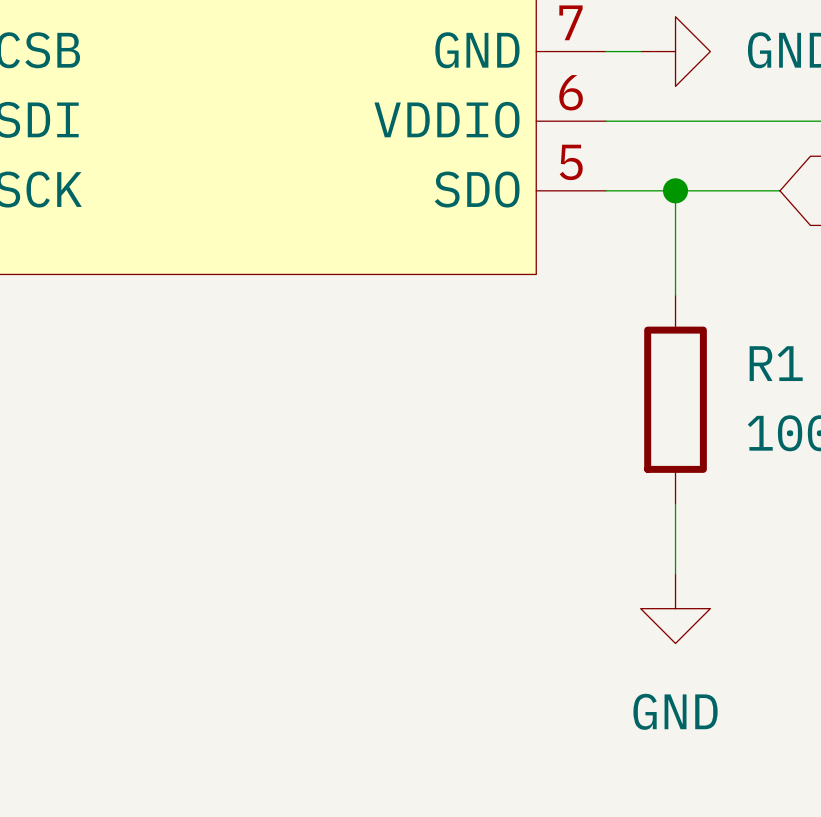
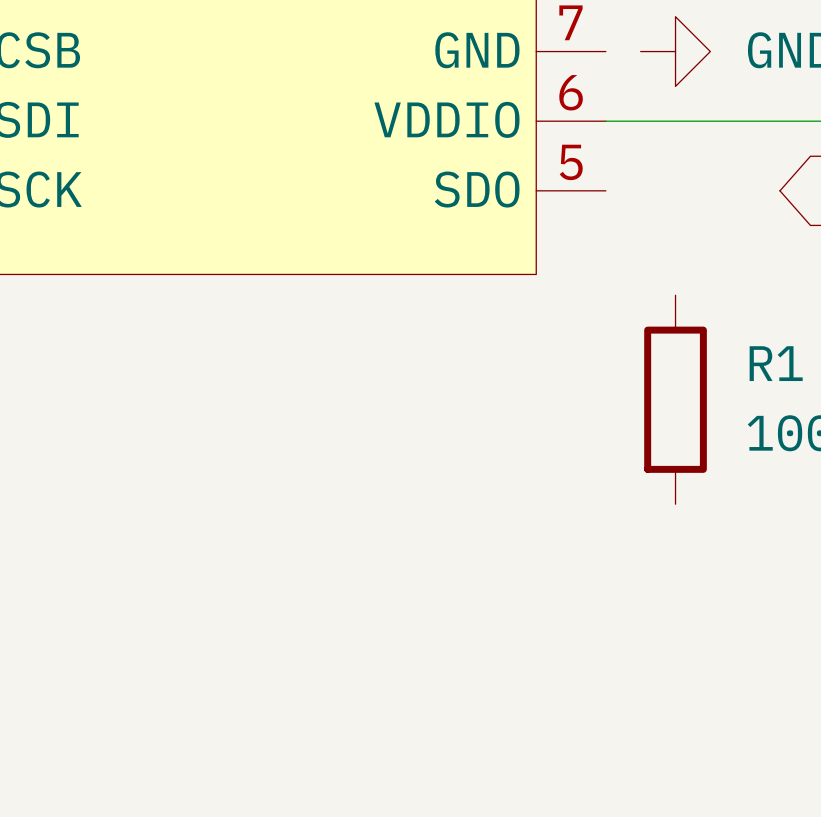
wire: (605, 51) (640, 51) -> none
wire: (605, 190) (779, 190) -> none
wire: (675, 190) (675, 295) -> none
junction: (675, 190) -> none
wire: (675, 504) (675, 573) -> none
power symbol: GND (675, 608) -> none

